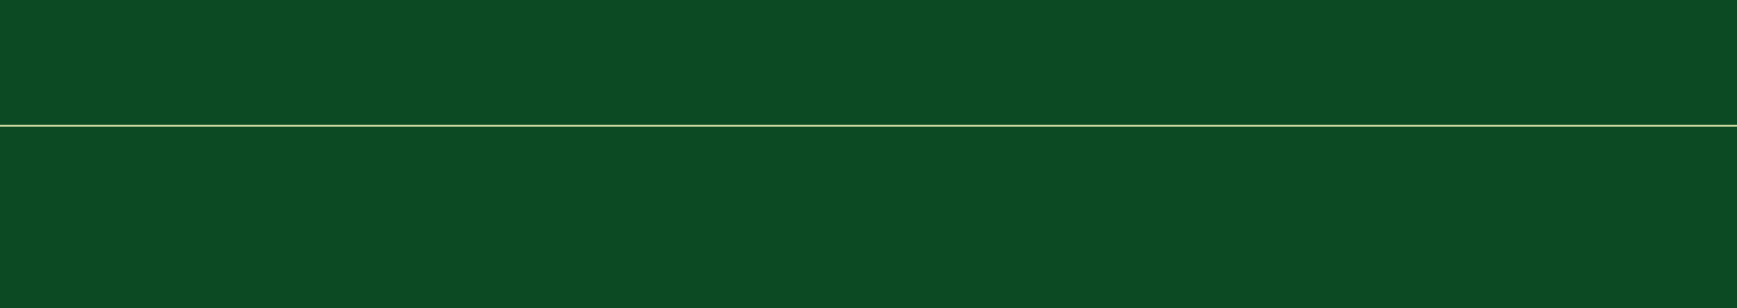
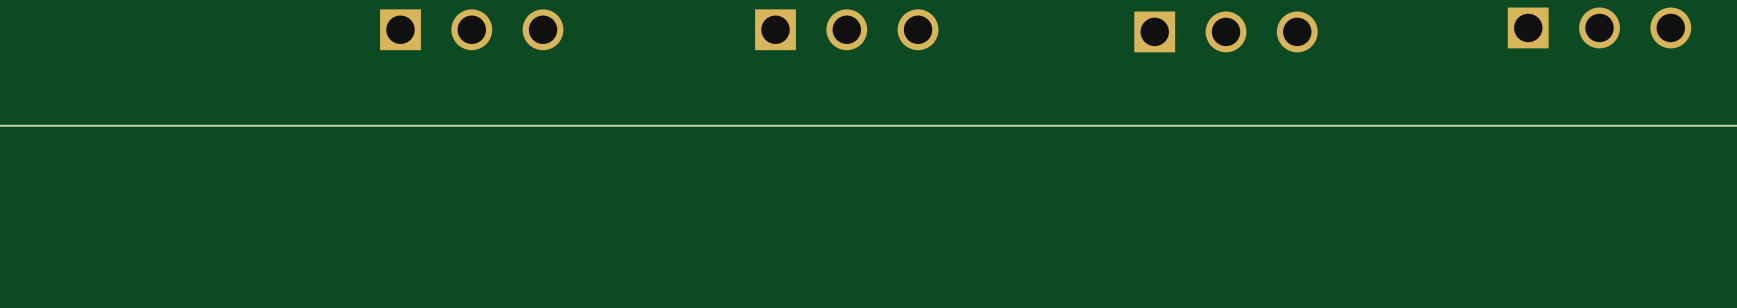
part: none -> (1599, 27)
part: none -> (471, 29)
part: none -> (846, 29)
part: none -> (1226, 31)

